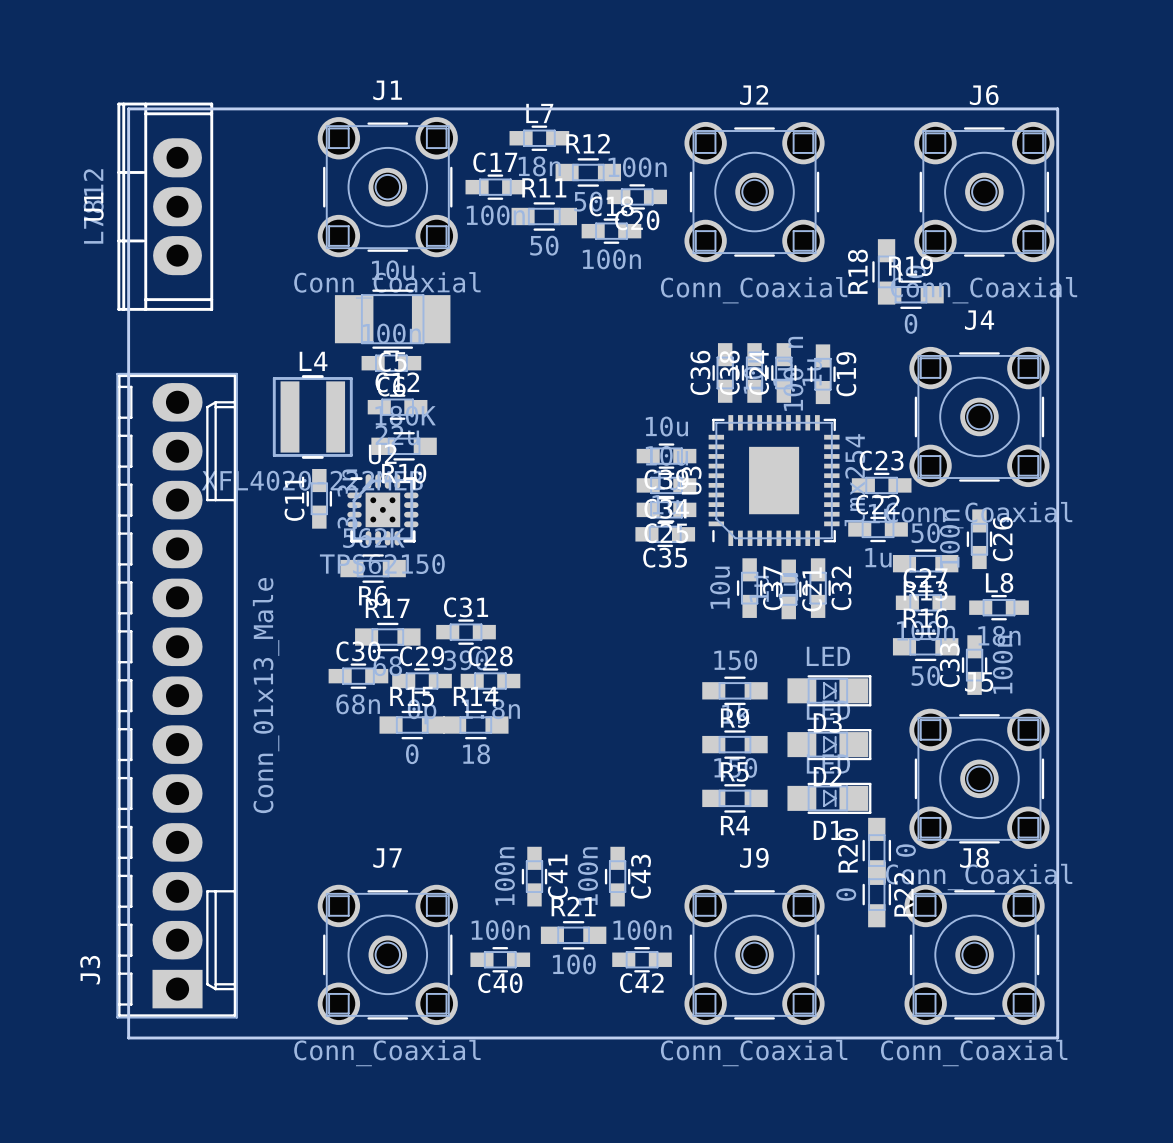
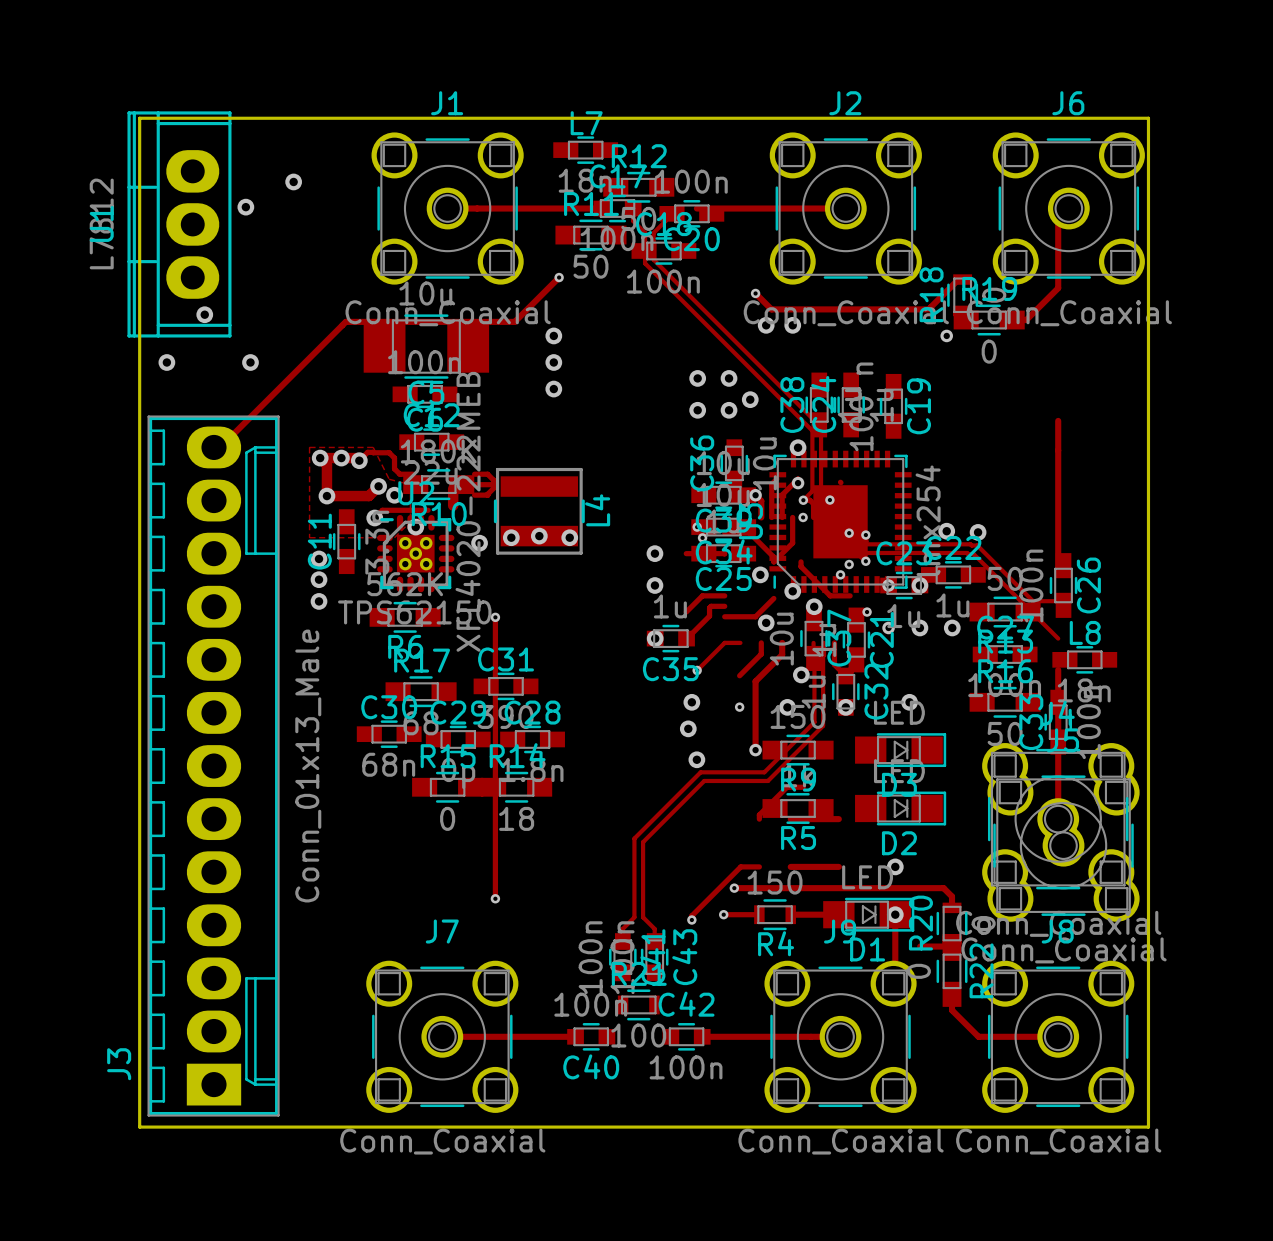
via: none -> (293, 181)
C17 footprint: [465, 174, 526, 200] -> [593, 194, 642, 223]
J1 position: (387, 187) -> (447, 208)
via: none -> (245, 207)
track: none -> (447, 208) (601, 208)
track: none -> (633, 208) (633, 221) (645, 232) (645, 263) (812, 430) (812, 491) (803, 500) (809, 500) (813, 503) (813, 517)
track: none -> (665, 208) (665, 221) (653, 232) (653, 259) (821, 427) (821, 491) (829, 500) (824, 505) (824, 517)
track: none -> (696, 208) (845, 208)
J2 position: (754, 192) -> (845, 208)
track: none -> (1058, 208) (1058, 288) (1026, 320) (1004, 320)
R18 footprint: [872, 239, 901, 305] -> [947, 274, 979, 317]
track: none -> (559, 277) (514, 321) (345, 321) (220, 447) (214, 447)
via: none -> (559, 277)
track: none -> (962, 279) (958, 279) (930, 309) (771, 309) (755, 293)
via: none -> (755, 293)
via: none -> (204, 314)
via: none -> (766, 325)
via: none -> (792, 325)
via: none -> (553, 335)
via: none -> (946, 335)
via: none -> (166, 362)
via: none -> (250, 362)
via: none -> (553, 362)
C36 footprint: [712, 343, 738, 403] -> [720, 439, 749, 488]
via: none -> (697, 378)
via: none -> (729, 378)
via: none -> (553, 389)
via: none -> (750, 399)
via: none -> (697, 410)
via: none -> (729, 410)
track: none -> (1058, 420) (1058, 569)
zone outline: none -> (309, 447) (373, 447) (389, 479) (410, 484) (410, 521) (394, 537) (309, 537) (309, 447)
via: none -> (798, 447)
L4 rotation: 0° (312, 416) -> 90° clockwise (539, 511)
L4 position: (312, 416) -> (539, 511)
J4 position: (979, 416) -> (1058, 819)
via: none -> (320, 458)
via: none -> (341, 458)
via: none -> (359, 460)
track: none -> (412, 474) (399, 474) (394, 468) (394, 458) (389, 452) (367, 452) (359, 460) (356, 458) (320, 458) (326, 464) (326, 496) (368, 496) (378, 486)
track: none -> (474, 474) (487, 474) (493, 480) (493, 484)
track: none -> (776, 479) (771, 484) (771, 517)
track: none -> (798, 483) (798, 479) (782, 494) (782, 517)
via: none -> (798, 483)
track: none -> (840, 482) (840, 482)
track: none -> (474, 484) (493, 484)
track: none -> (493, 484) (495, 486) (487, 495) (474, 495)
via: none -> (378, 486)
track: none -> (453, 488) (453, 505)
via: none -> (326, 496)
via: none -> (394, 495)
track: none -> (755, 495) (761, 500) (761, 517)
via: none -> (755, 495)
via: none -> (803, 500)
via: none -> (829, 500)
track: none -> (428, 510) (382, 510) (374, 518)
C23 footprint: [851, 472, 912, 499] -> [880, 571, 929, 600]
track: none -> (792, 517) (792, 543) (773, 561) (773, 557) (749, 533) (724, 533)
via: none -> (803, 517)
via: none -> (374, 518)
via: none -> (415, 527)
via: none -> (697, 527)
via: none -> (946, 531)
via: none -> (978, 532)
via: none -> (849, 533)
track: none -> (865, 535) (863, 543) (850, 543) (977, 545) (1033, 601) (1058, 601)
via: none -> (865, 535)
via: none -> (539, 536)
via: none -> (511, 537)
via: none -> (569, 537)
via: none -> (702, 537)
via: none -> (479, 543)
via: none -> (654, 553)
track: none -> (686, 553) (724, 554)
via: none -> (319, 558)
track: none -> (865, 561) (858, 554) (850, 554) (967, 552) (973, 554) (1058, 638)
via: none -> (865, 561)
track: none -> (801, 561) (801, 566) (830, 595) (850, 595)
via: none -> (849, 564)
C35 footprint: [635, 521, 696, 548] -> [646, 624, 695, 653]
via: none -> (760, 574)
via: none -> (840, 574)
via: none -> (319, 579)
via: none -> (654, 585)
via: none -> (888, 585)
via: none -> (919, 585)
via: none -> (792, 591)
track: none -> (724, 595) (702, 595) (686, 612)
track: none -> (773, 598) (755, 616) (724, 616)
via: none -> (319, 601)
track: none -> (724, 606) (711, 606) (709, 616) (686, 638)
via: none -> (814, 606)
C32 footprint: [805, 558, 831, 618] -> [832, 667, 860, 716]
via: none -> (867, 612)
track: none -> (495, 617) (495, 898)
via: none -> (495, 617)
via: none -> (766, 622)
via: none -> (888, 627)
via: none -> (919, 627)
via: none -> (952, 627)
via: none -> (655, 638)
track: none -> (740, 642) (724, 642) (697, 670)
track: none -> (761, 642) (761, 654) (739, 675)
track: none -> (782, 642) (782, 654) (755, 681) (755, 750)
track: none -> (813, 642) (814, 722) (764, 772) (700, 772) (634, 838) (634, 917) (622, 928) (622, 941)
track: none -> (824, 642) (823, 725) (767, 780) (704, 780) (643, 842) (643, 917) (654, 928) (654, 941)
track: none -> (834, 642) (834, 664) (845, 676)
track: none -> (1058, 669) (1058, 819)
via: none -> (697, 670)
via: none -> (801, 674)
via: none -> (691, 702)
via: none -> (909, 702)
via: none -> (739, 707)
via: none -> (787, 707)
via: none -> (845, 707)
via: none -> (688, 728)
via: none -> (755, 750)
J3 position: (177, 695) -> (213, 766)
via: none -> (696, 759)
track: none -> (803, 787) (787, 787) (759, 814) (759, 819)
track: none -> (790, 819) (838, 819)
R4 footprint: [702, 784, 768, 813] -> [754, 899, 796, 931]
track: none -> (759, 866) (740, 866) (691, 915) (691, 920)
track: none -> (790, 866) (838, 866)
via: none -> (895, 866)
D1 position: (829, 798) -> (868, 914)
track: none -> (734, 888) (943, 888) (952, 896) (952, 907)
via: none -> (734, 888)
R20 footprint: [862, 817, 892, 884] -> [936, 902, 968, 945]
via: none -> (495, 898)
track: none -> (723, 914) (759, 914)
via: none -> (723, 914)
track: none -> (790, 914) (838, 914)
track: none -> (895, 914) (895, 982) (893, 983)
via: none -> (895, 914)
C41 footprint: [521, 846, 548, 907] -> [609, 933, 637, 982]
C43 footprint: [604, 846, 631, 907] -> [640, 933, 669, 982]
via: none -> (691, 920)
track: none -> (920, 946) (944, 946)
track: none -> (952, 987) (952, 1010) (978, 1036) (1058, 1036)
R21 footprint: [540, 921, 607, 950] -> [617, 989, 660, 1021]
C42 value position: 100n (642, 930) -> 100n (686, 1067)
C40 footprint: [470, 947, 531, 973] -> [567, 1023, 616, 1051]
C42 footprint: [612, 947, 672, 973] -> [662, 1023, 711, 1051]
J7 position: (387, 954) -> (442, 1036)
track: none -> (442, 1036) (575, 1036)
track: none -> (702, 1036) (840, 1036)
J9 position: (754, 954) -> (840, 1036)
C42 name position: C42 (641, 983) -> C42 (686, 1004)

